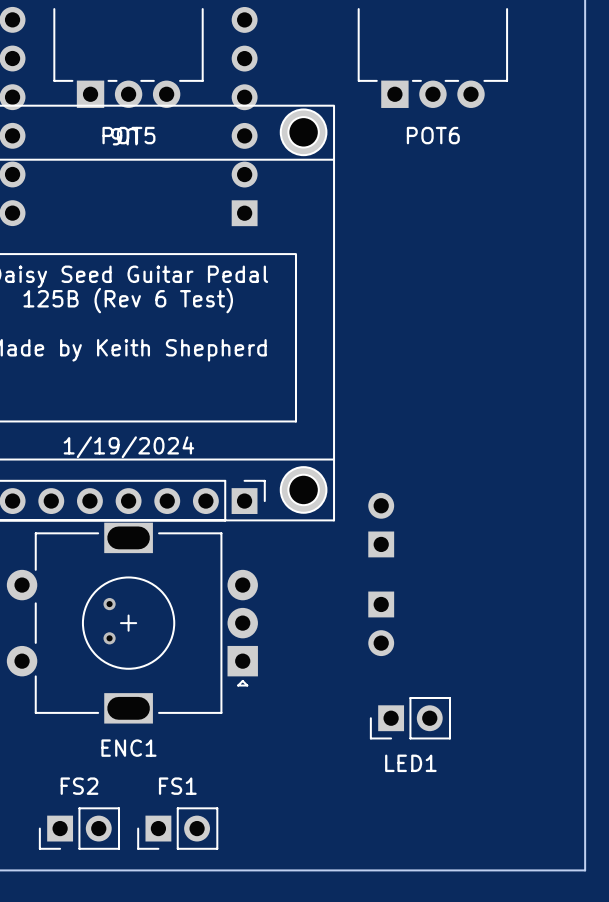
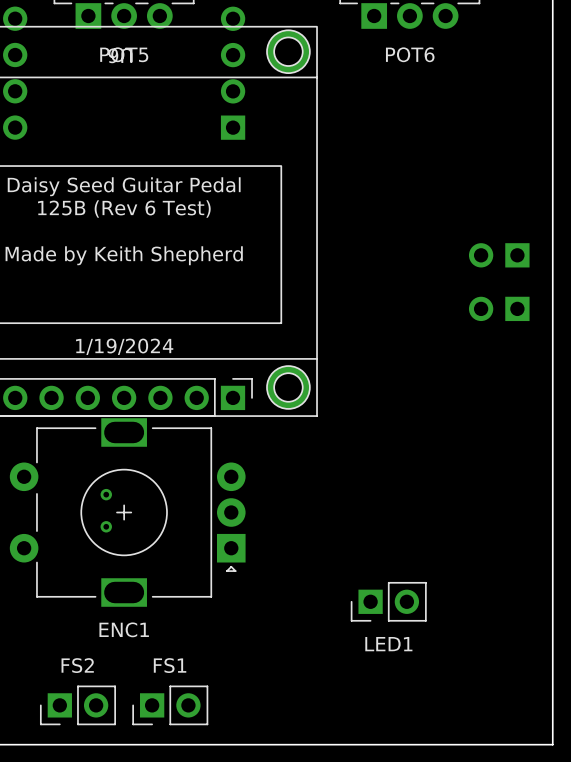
part: none -> (499, 255)
part: none -> (499, 308)
part: (381, 525) -> none
part: (381, 623) -> none

